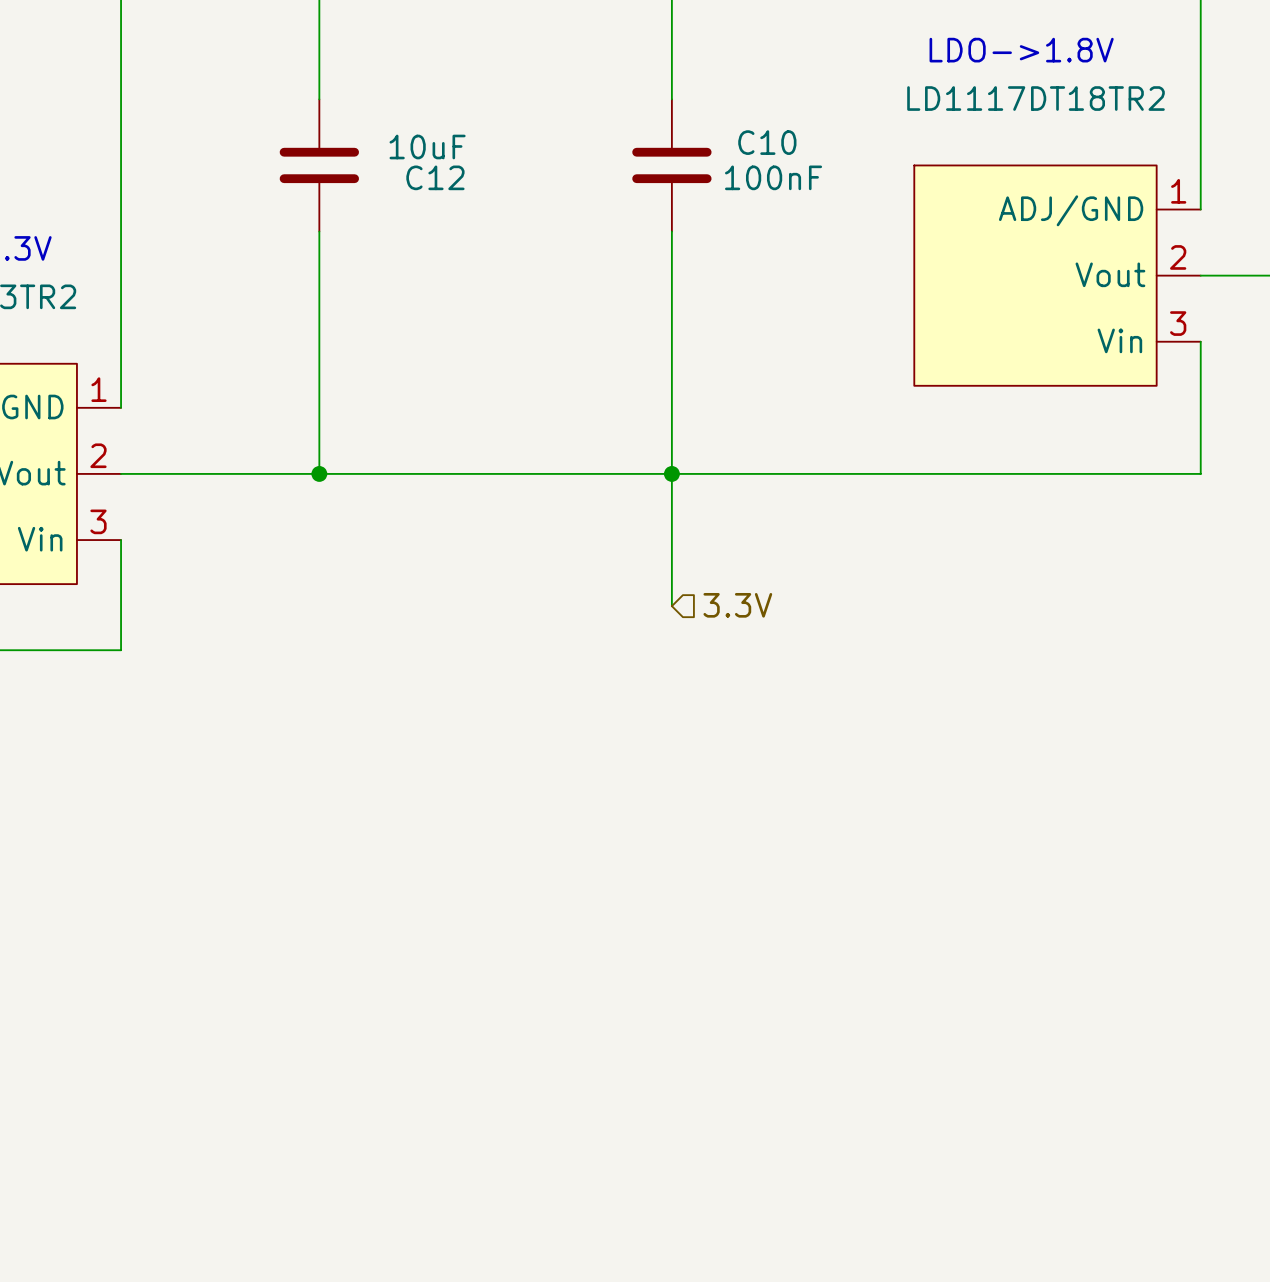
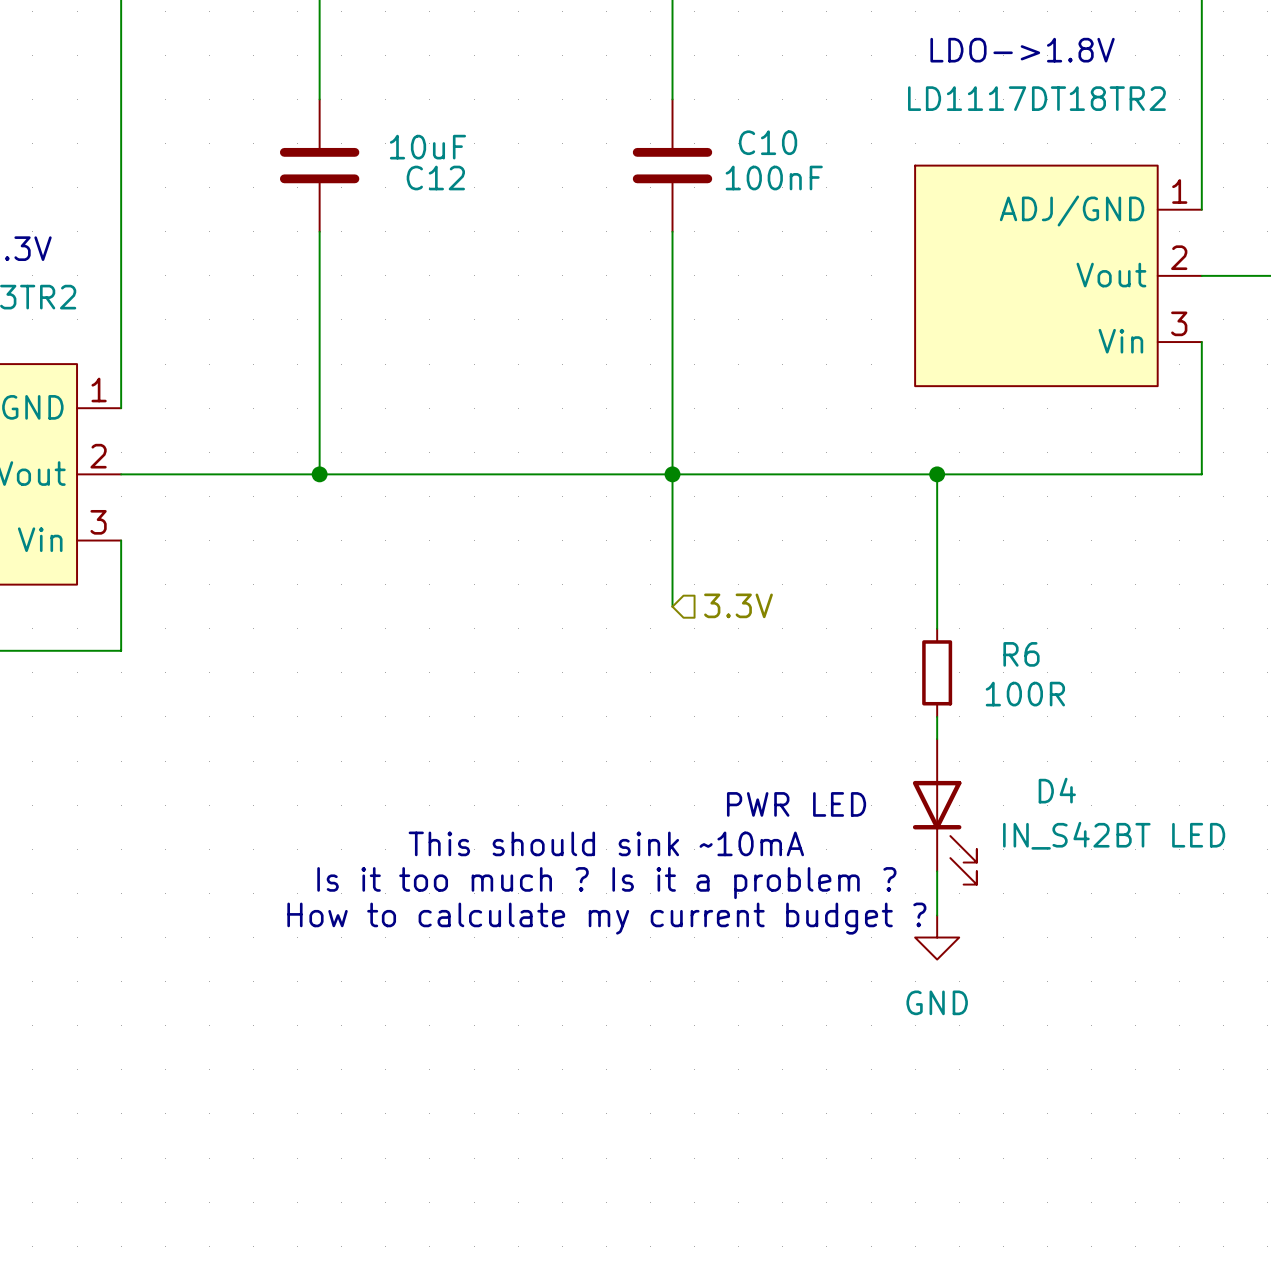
wire: none -> (937, 474) (937, 628)
junction: none -> (937, 474)
R6: none -> 100R (937, 672)
wire: none -> (937, 716) (937, 739)
text: none -> PWR LED (796, 804)
D4: none -> IN_S42BT LED (944, 811)
text: none -> This should sink ~10mA (606, 843)
wire: none -> (937, 871) (937, 915)
text: none -> Is it too much ? Is it a problem ? (606, 883)
text: none -> How to calculate my current budget ? (606, 918)
power symbol: none -> GND (937, 937)

